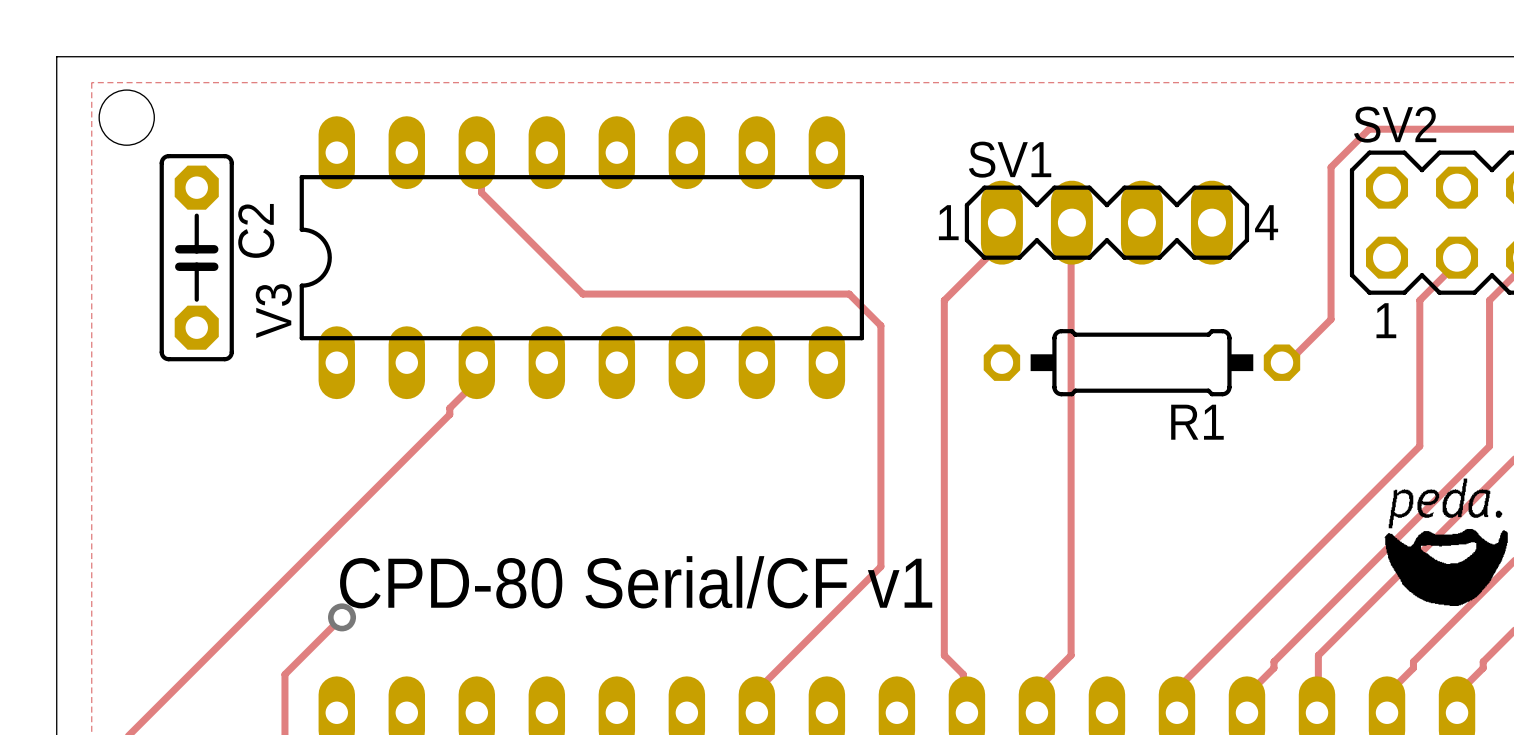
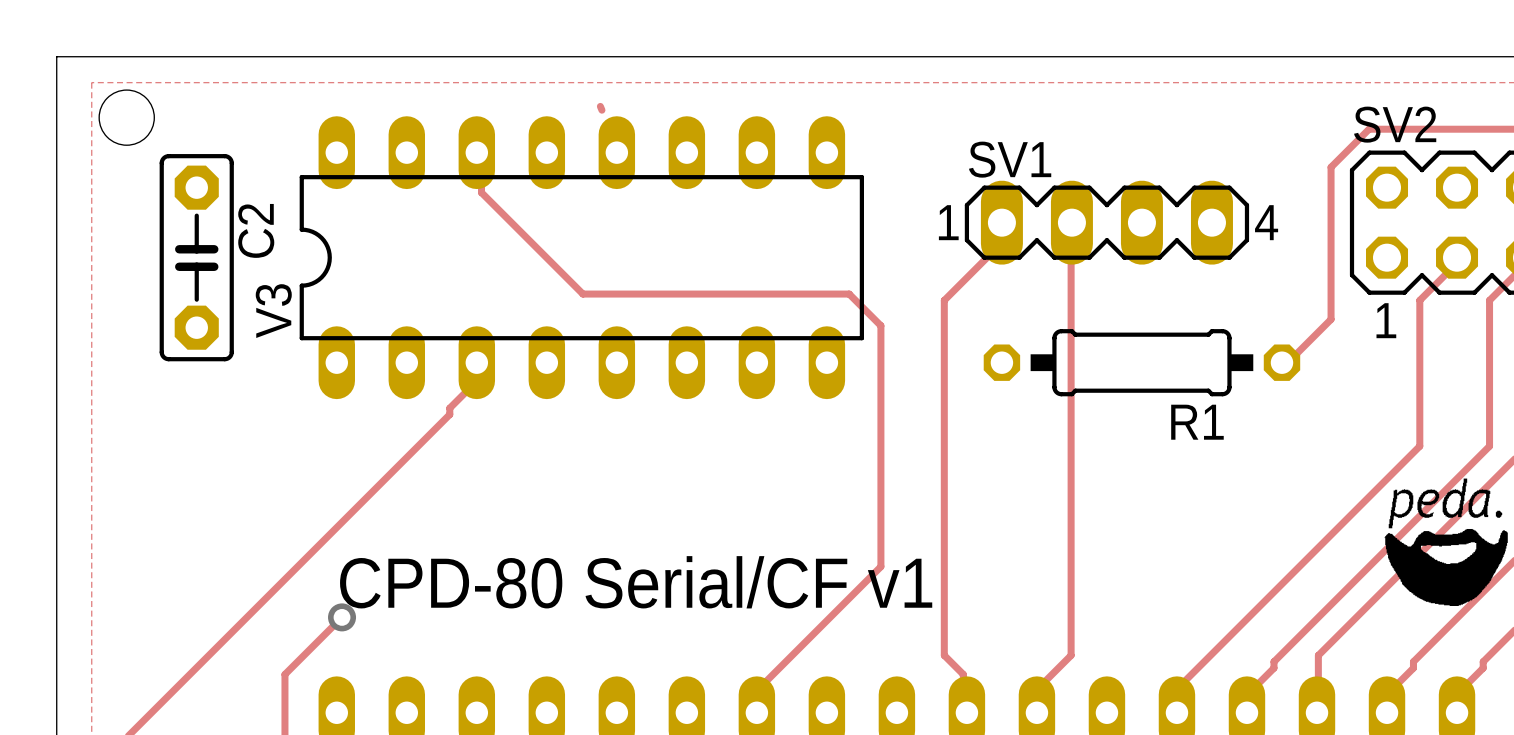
track: none -> (600, 106) (601, 110)

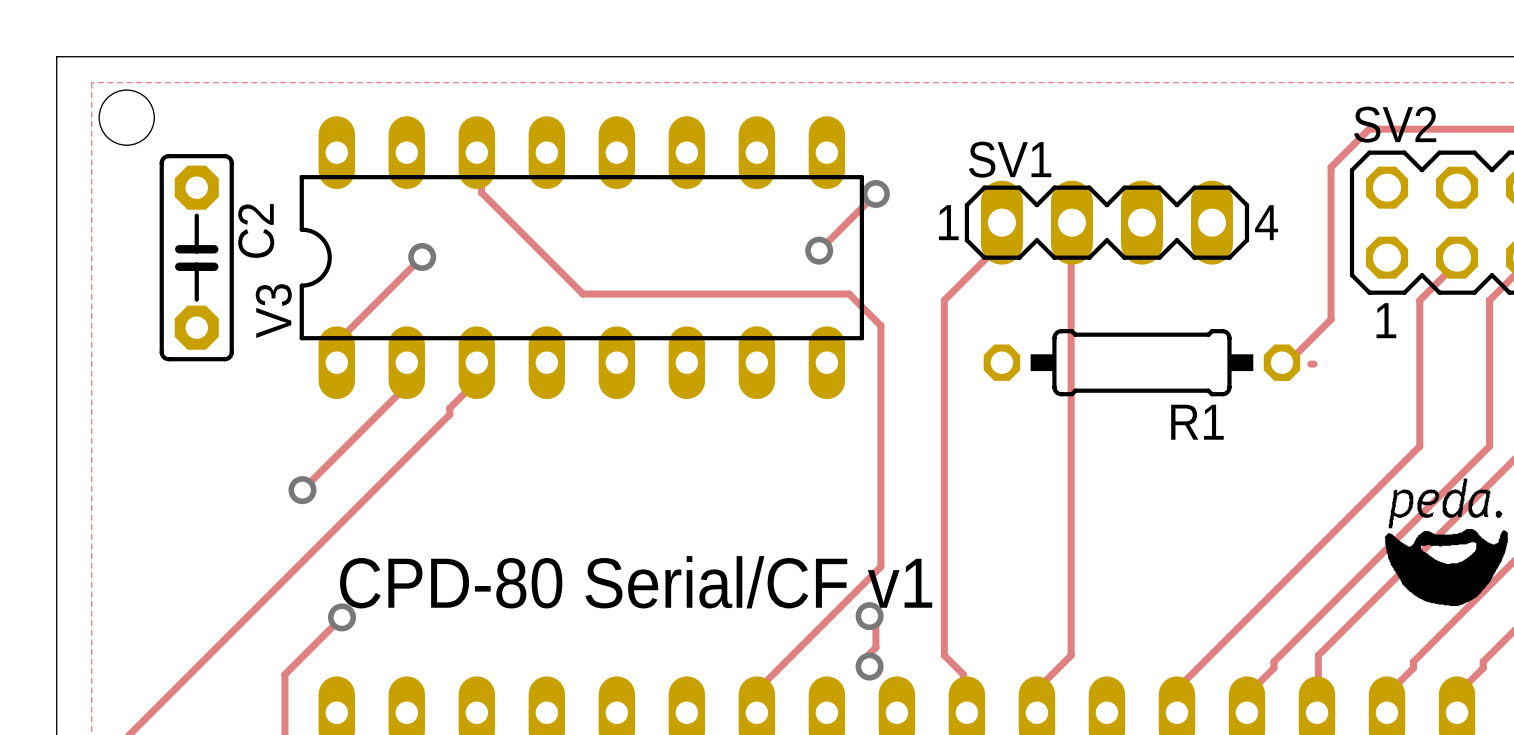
track: (600, 106) (601, 110) -> none
track: none -> (875, 193) (819, 250)
via: none -> (875, 193)
via: none -> (819, 250)
track: none -> (422, 256) (340, 338) (340, 357) (336, 362)
via: none -> (422, 256)
track: none -> (406, 362) (403, 364) (403, 389) (302, 490)
track: none -> (1310, 364) (1314, 364)
via: none -> (302, 490)
track: none -> (869, 616) (875, 622) (875, 647) (869, 653) (869, 666)
via: none -> (869, 616)
via: none -> (869, 666)

